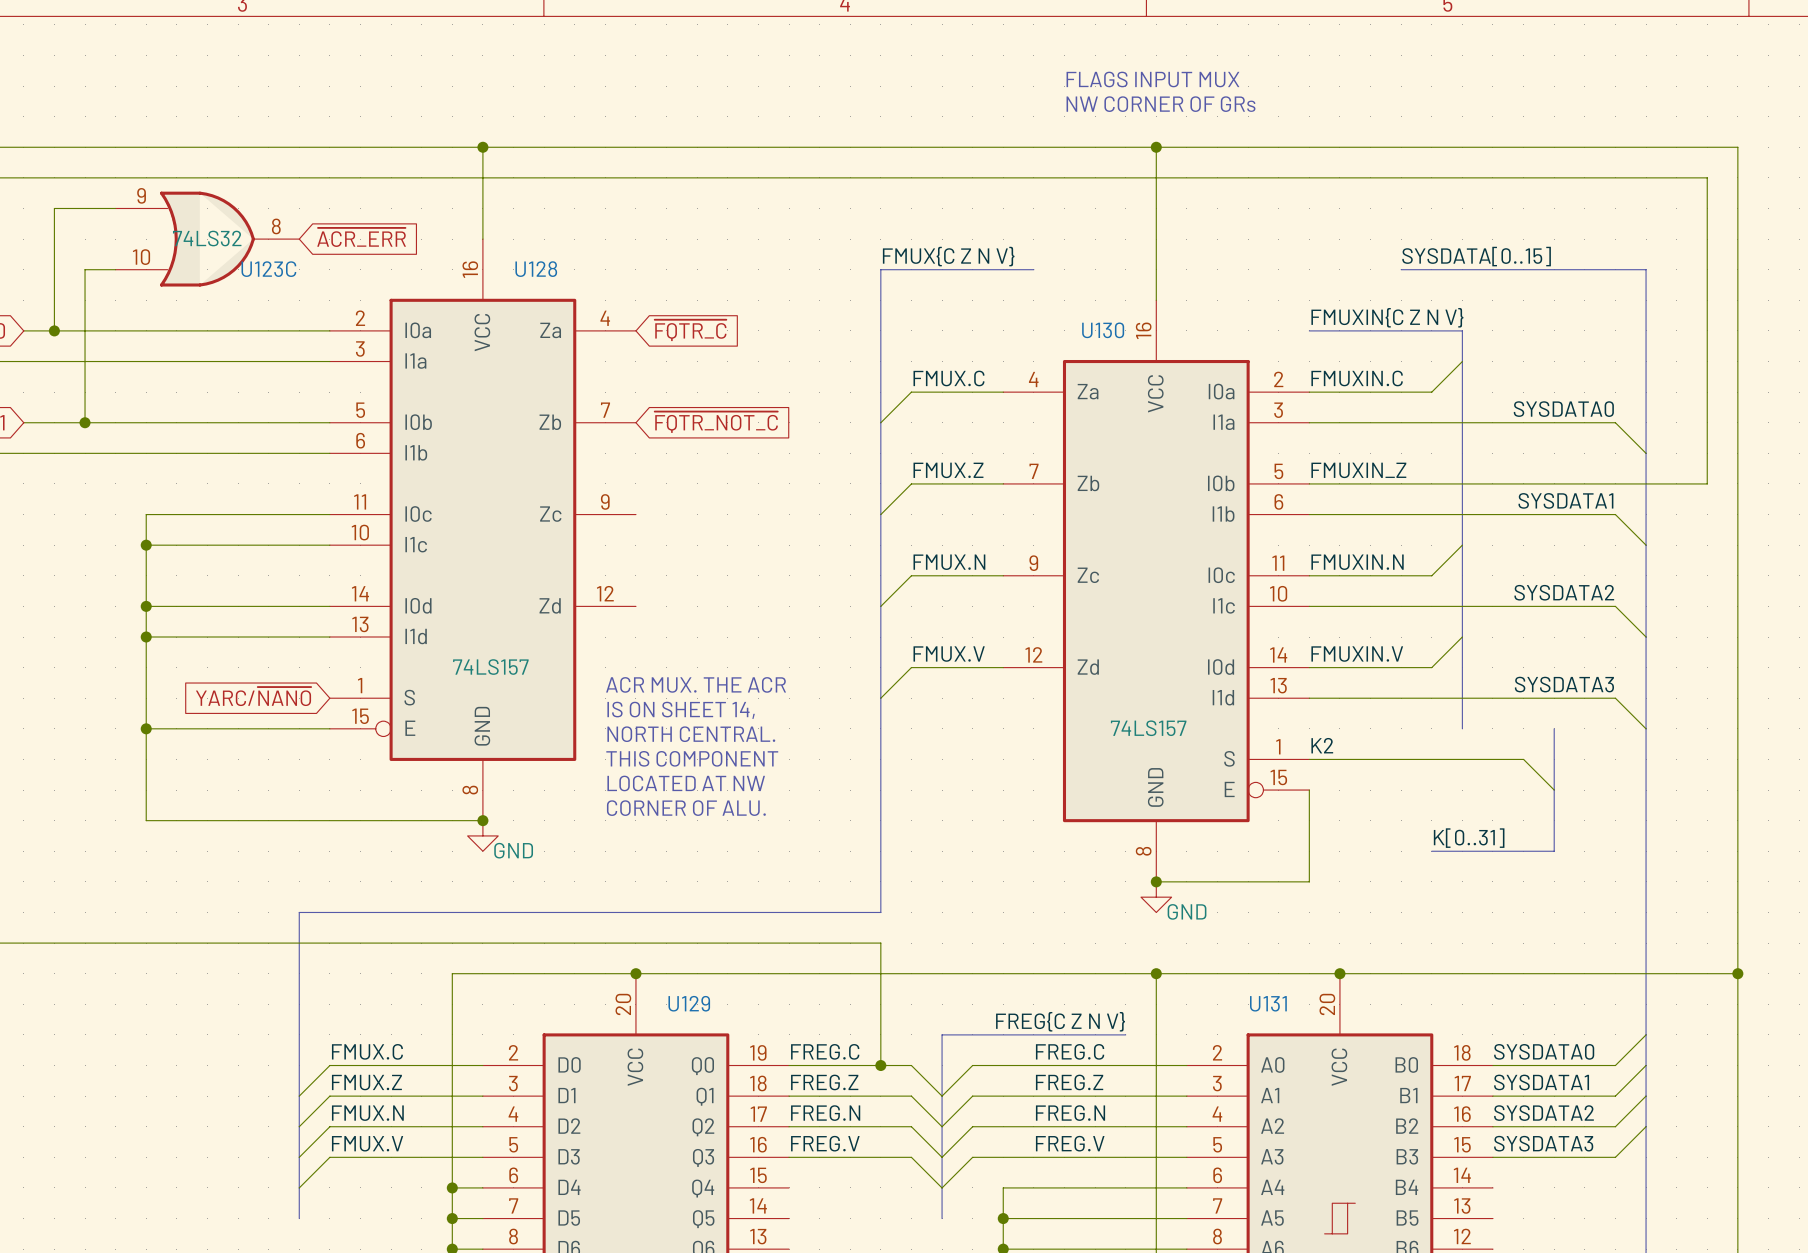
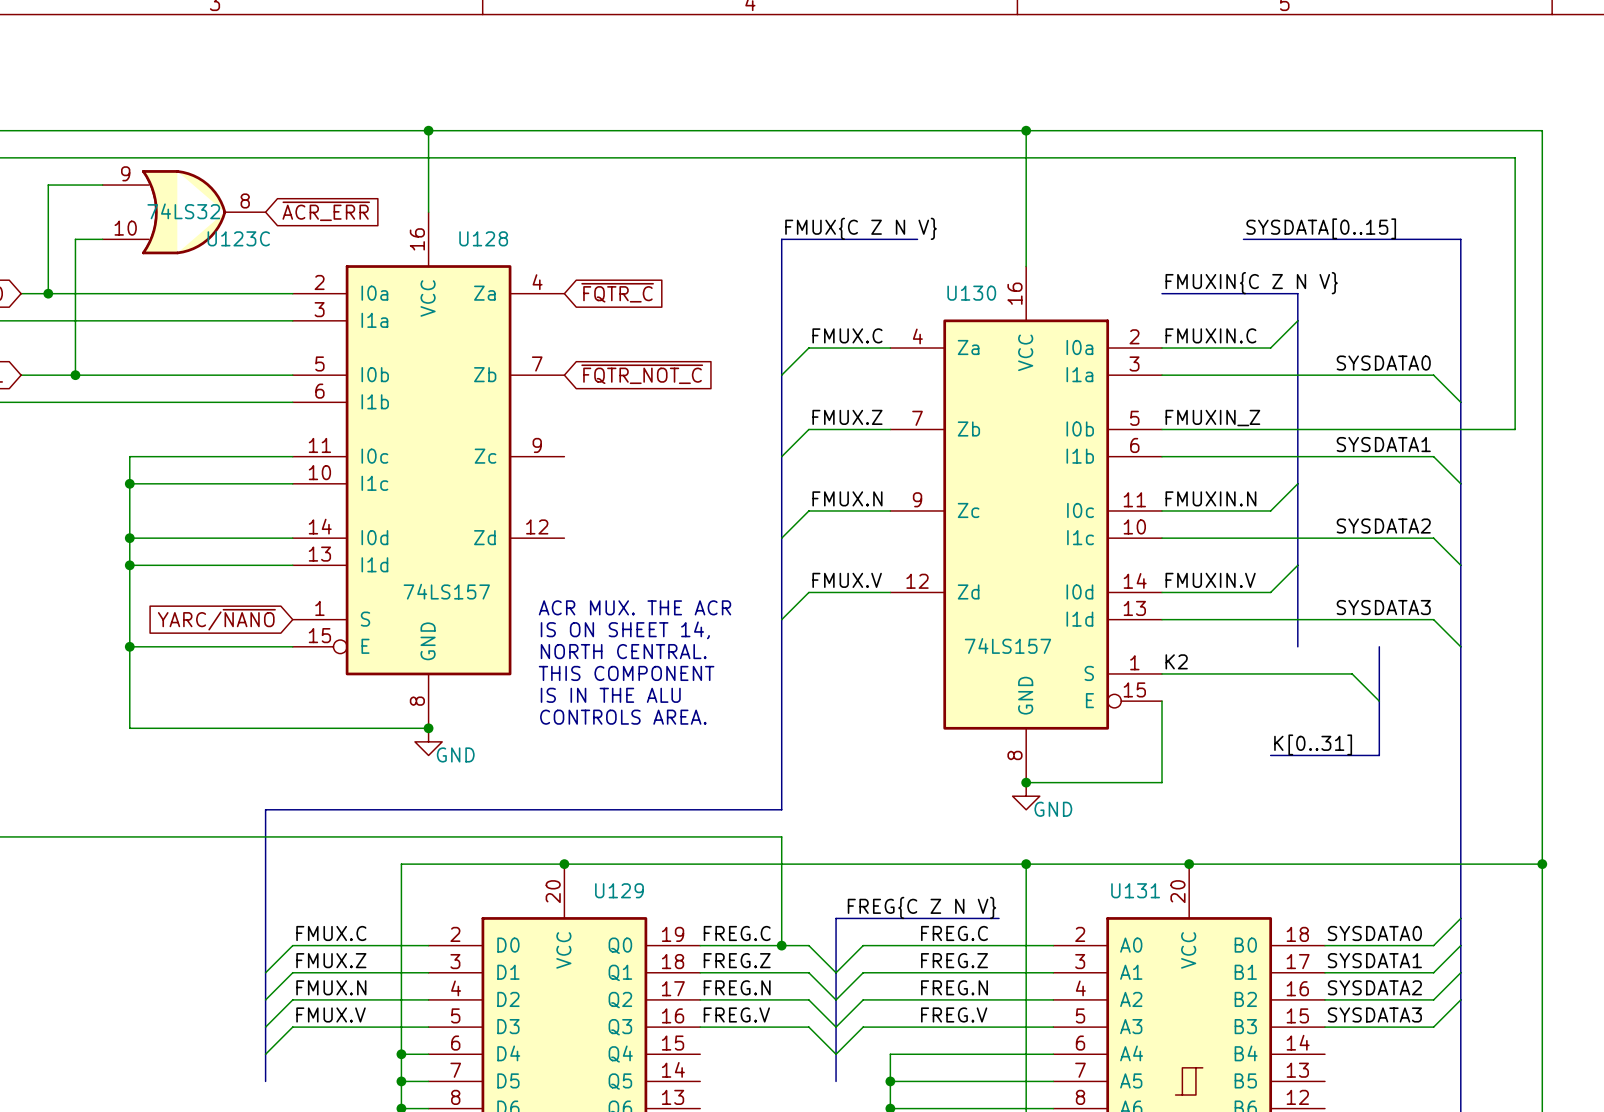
text: FLAGS INPUT MUX (1152, 79) -> none
text: NW CORNER OF GRs (1160, 104) -> none
text: LOCATED AT NW (686, 783) -> IS IN THE ALU (610, 695)
text: CORNER OF ALU. (686, 808) -> CONTROLS AREA. (623, 717)

